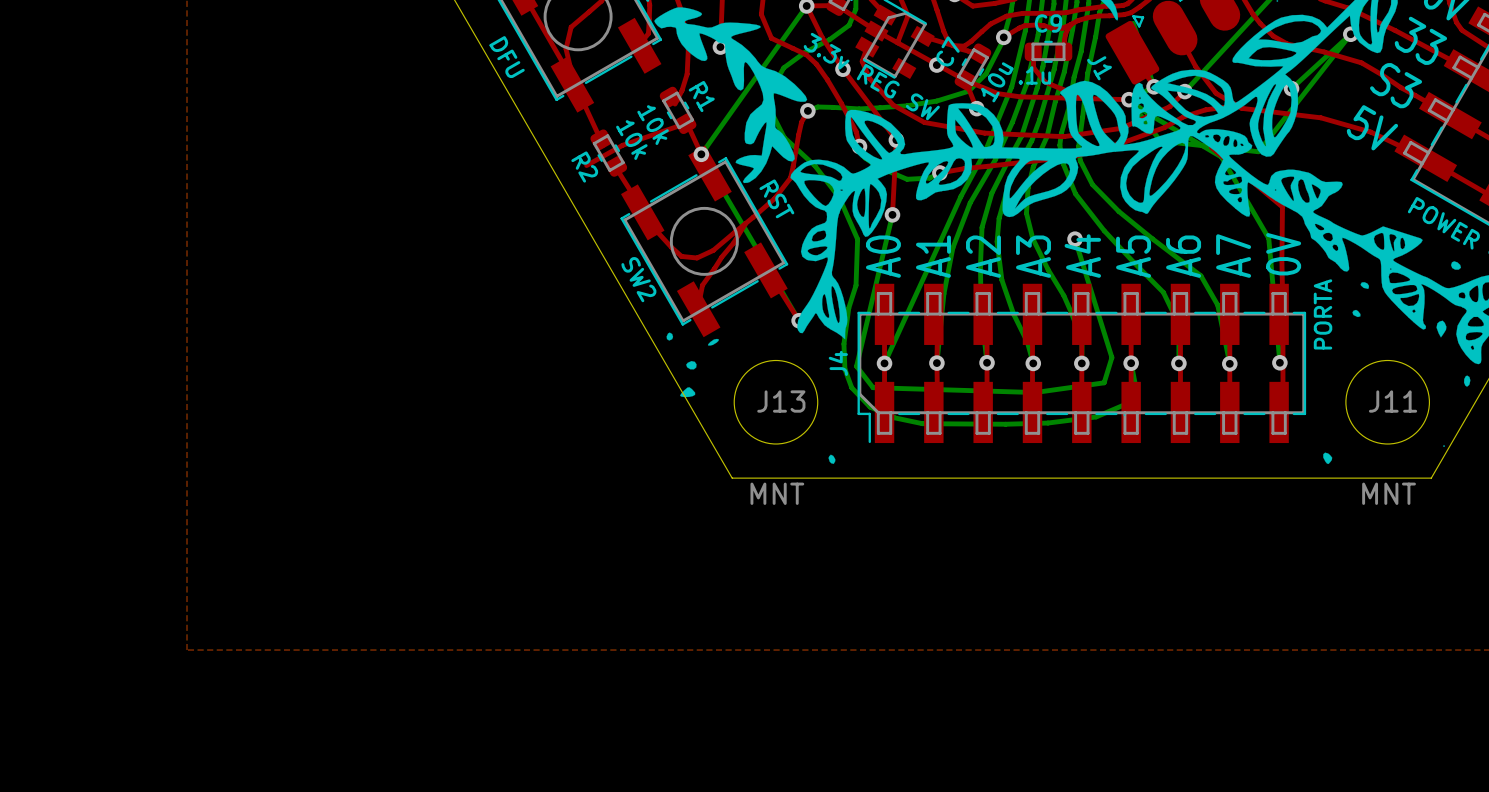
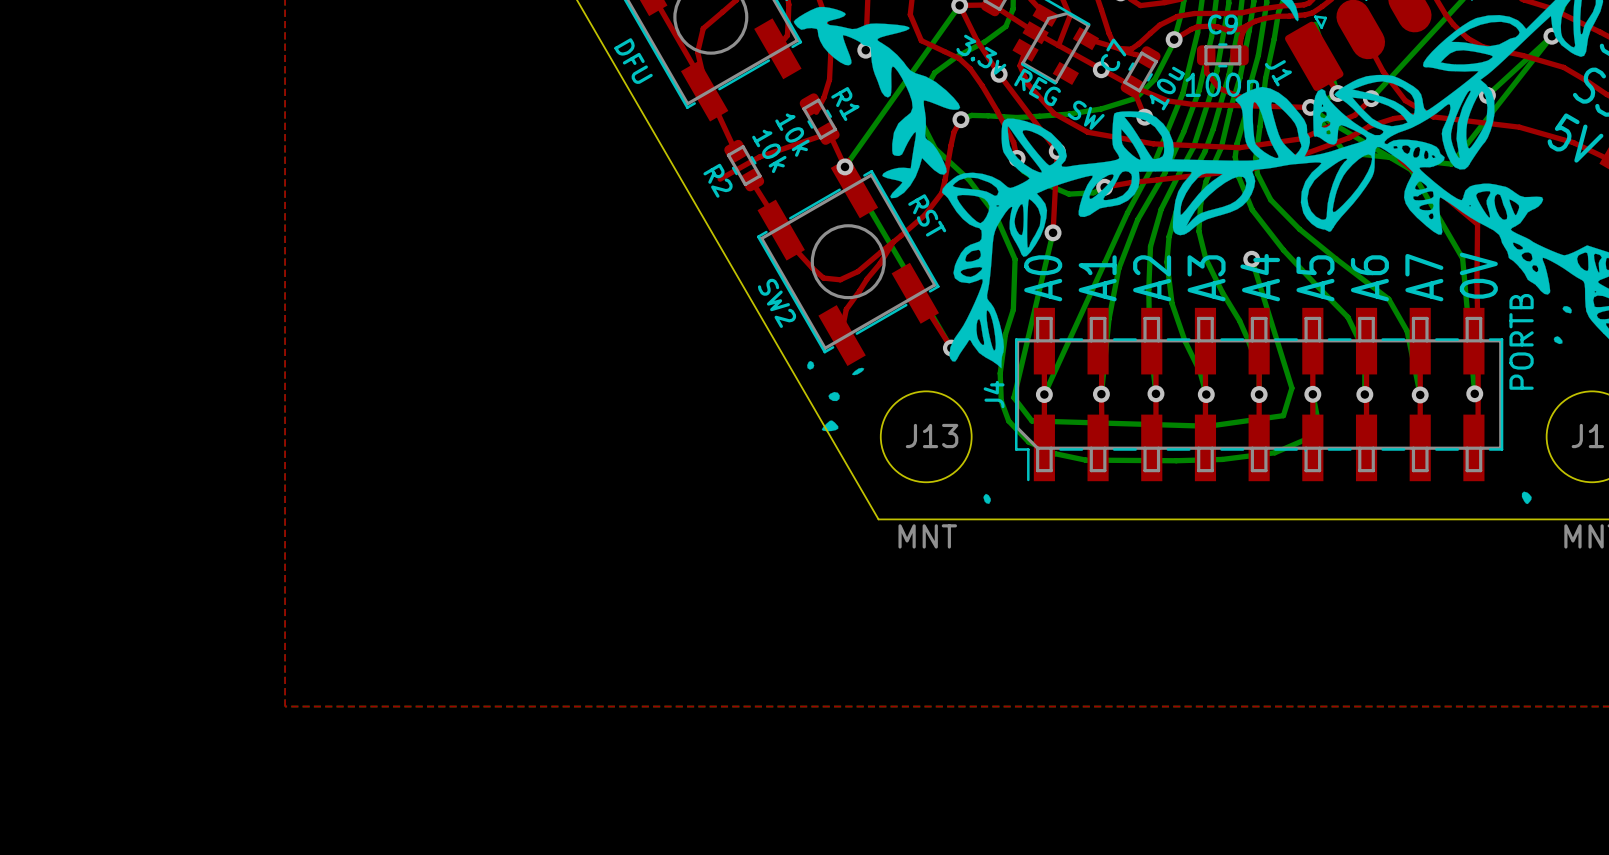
C9 value: .1u (1034, 75) -> 100n (1222, 84)
J4 value: PORTA (1323, 314) -> PORTB (1521, 341)

